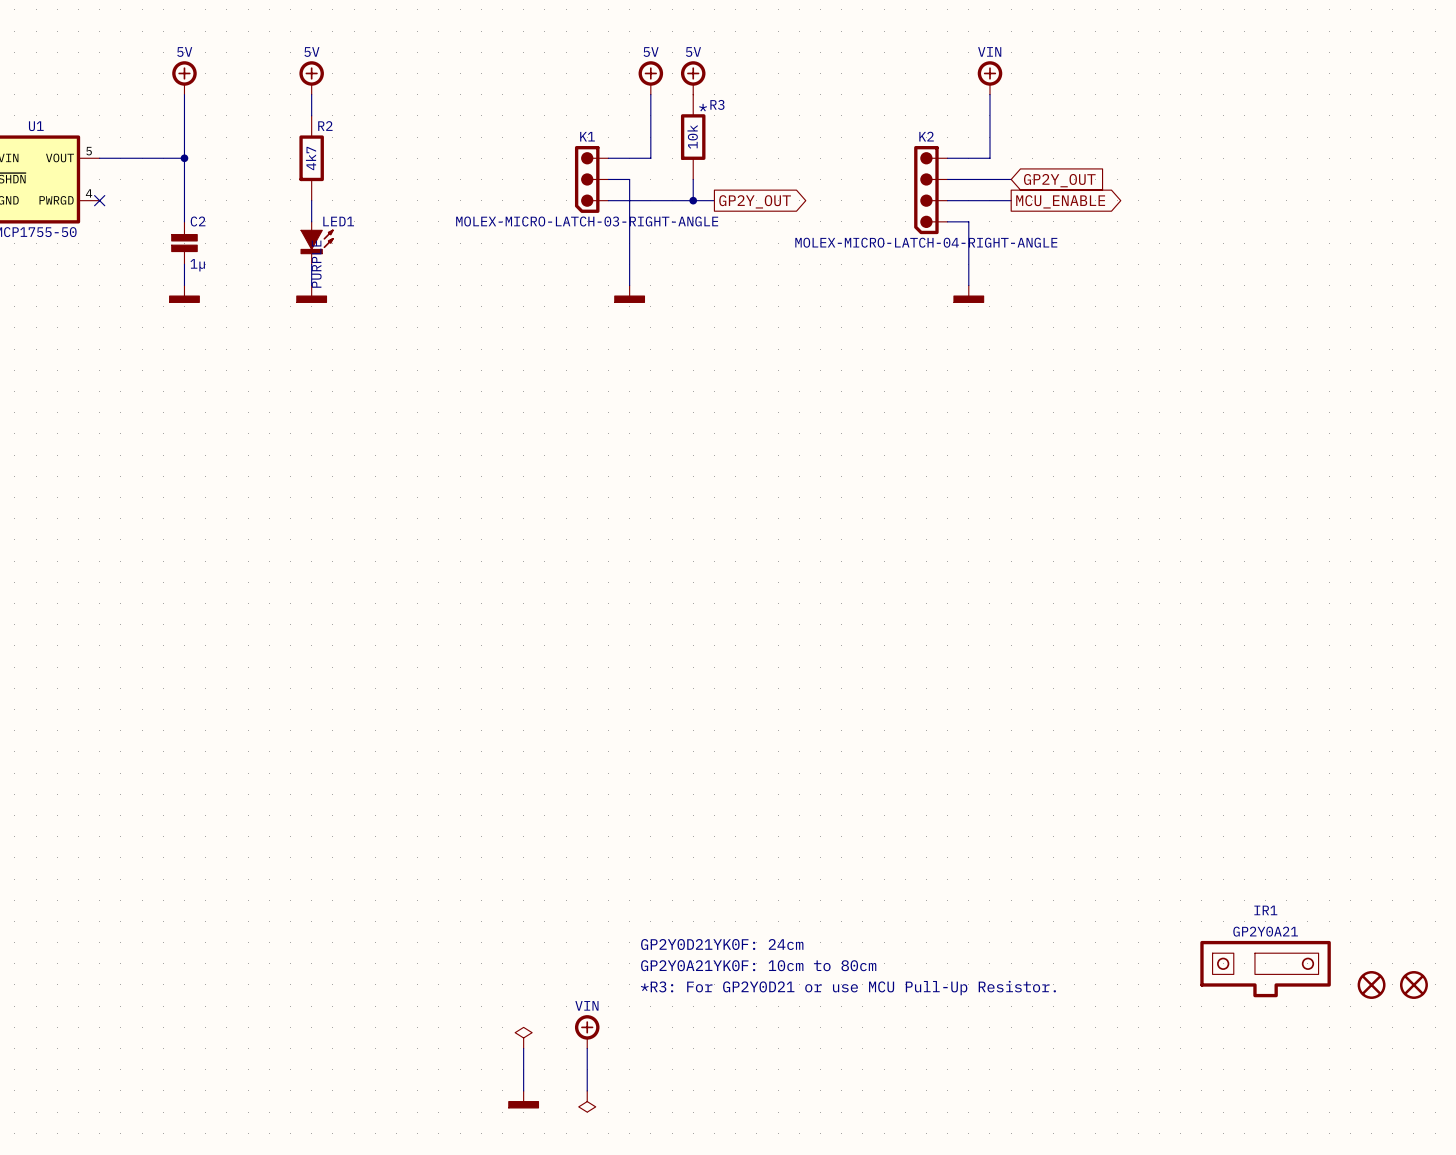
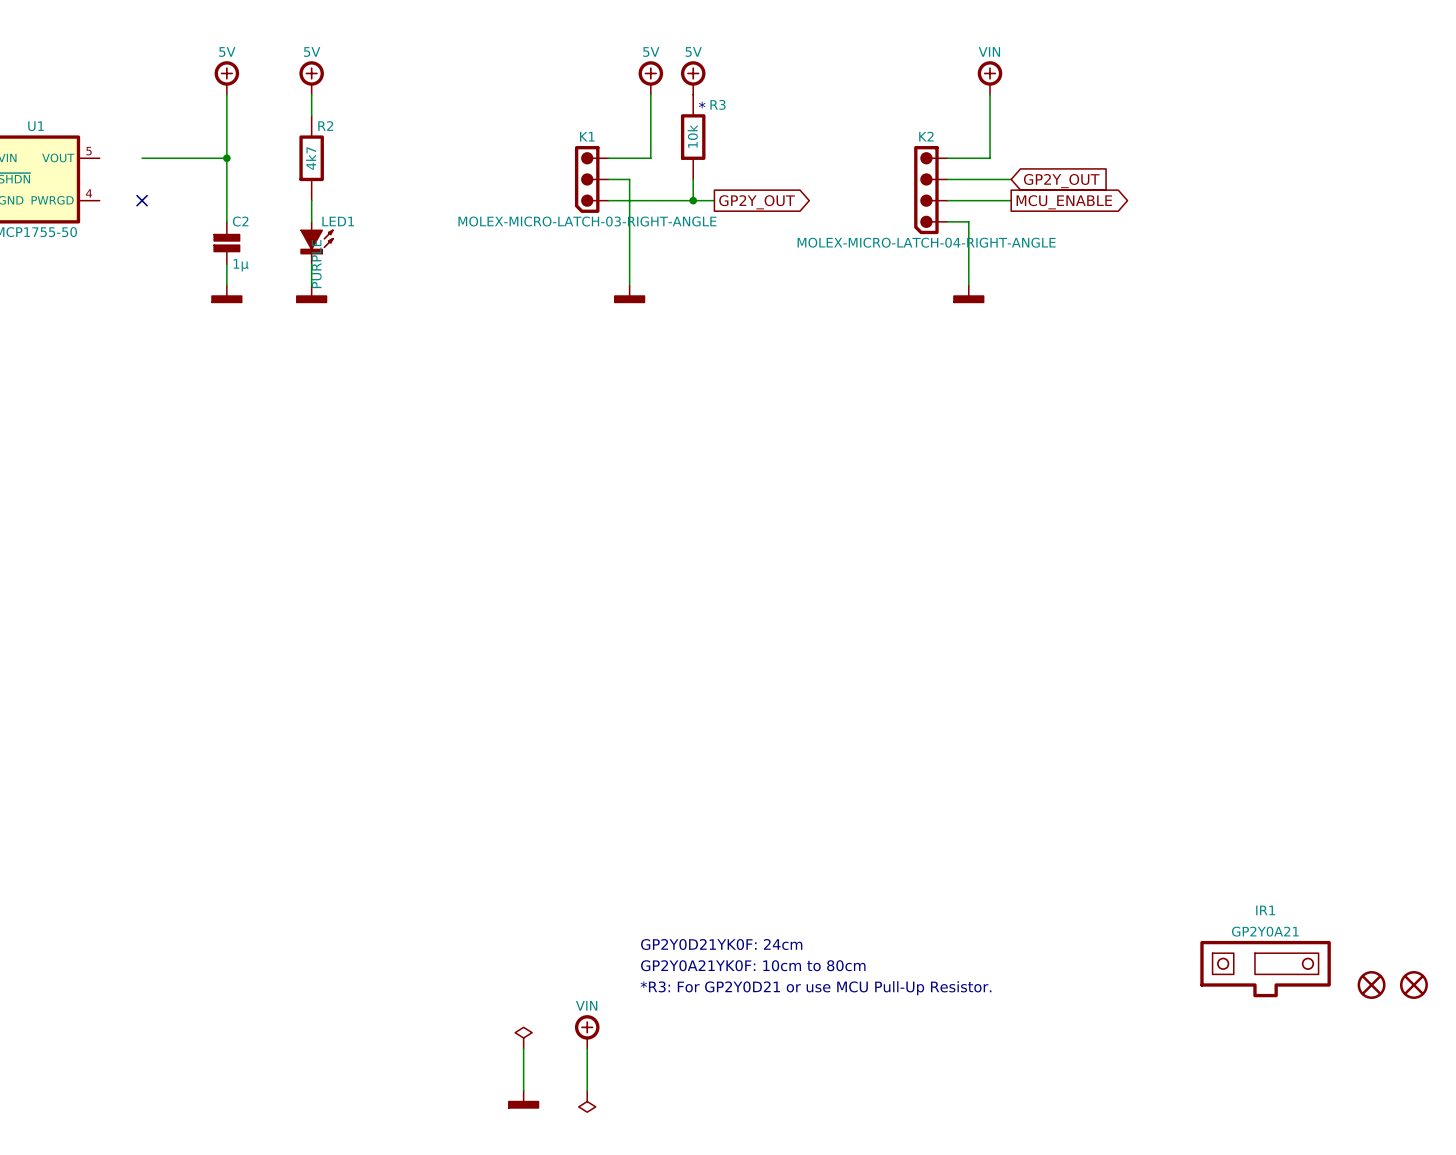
power symbol position: (184, 77) -> (226, 77)
wire: (184, 94) (184, 221) -> (226, 94) (226, 221)
wire: (99, 158) (142, 158) -> (184, 158) (226, 158)
junction position: (184, 158) -> (226, 158)
no-connect mark position: (99, 200) -> (142, 200)
C2 position: (184, 243) -> (226, 243)
wire: (184, 264) (184, 285) -> (226, 264) (226, 285)
power symbol position: (184, 293) -> (226, 293)

